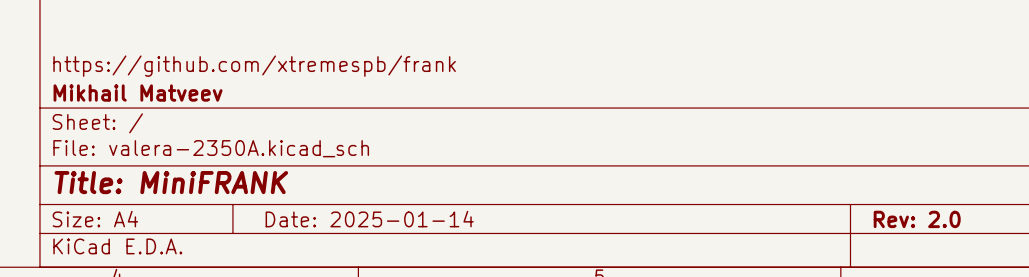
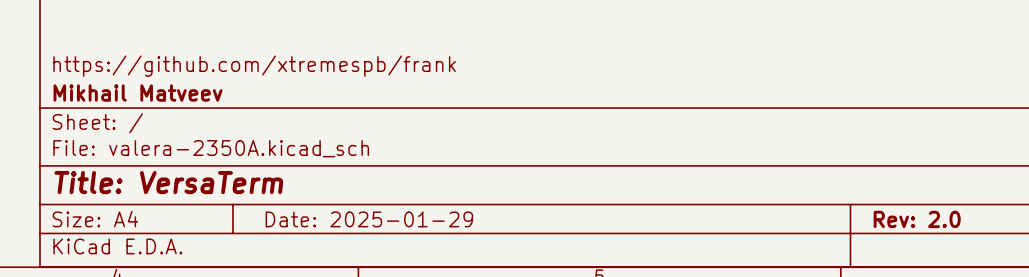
title block: Title: MiniFRANK (171, 182) -> Title: VersaTerm (168, 182)
title block: Date: 2025-01-14 (369, 219) -> Date: 2025-01-29 (369, 219)

